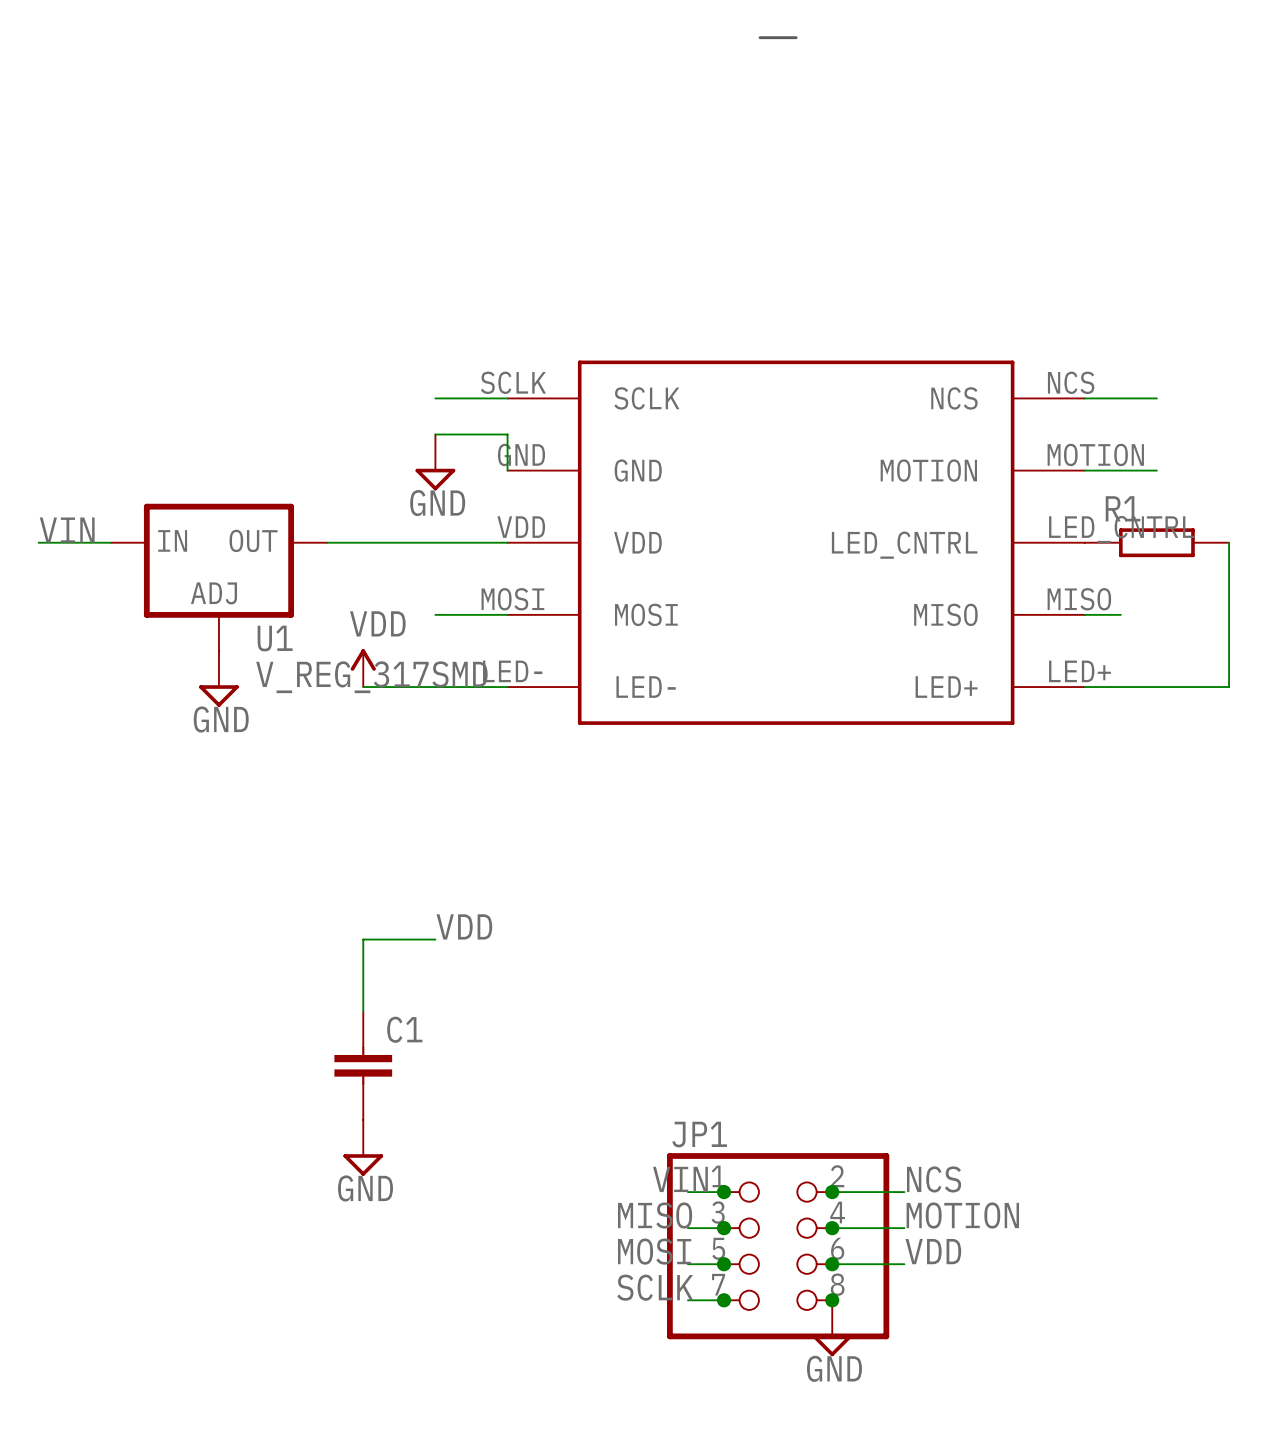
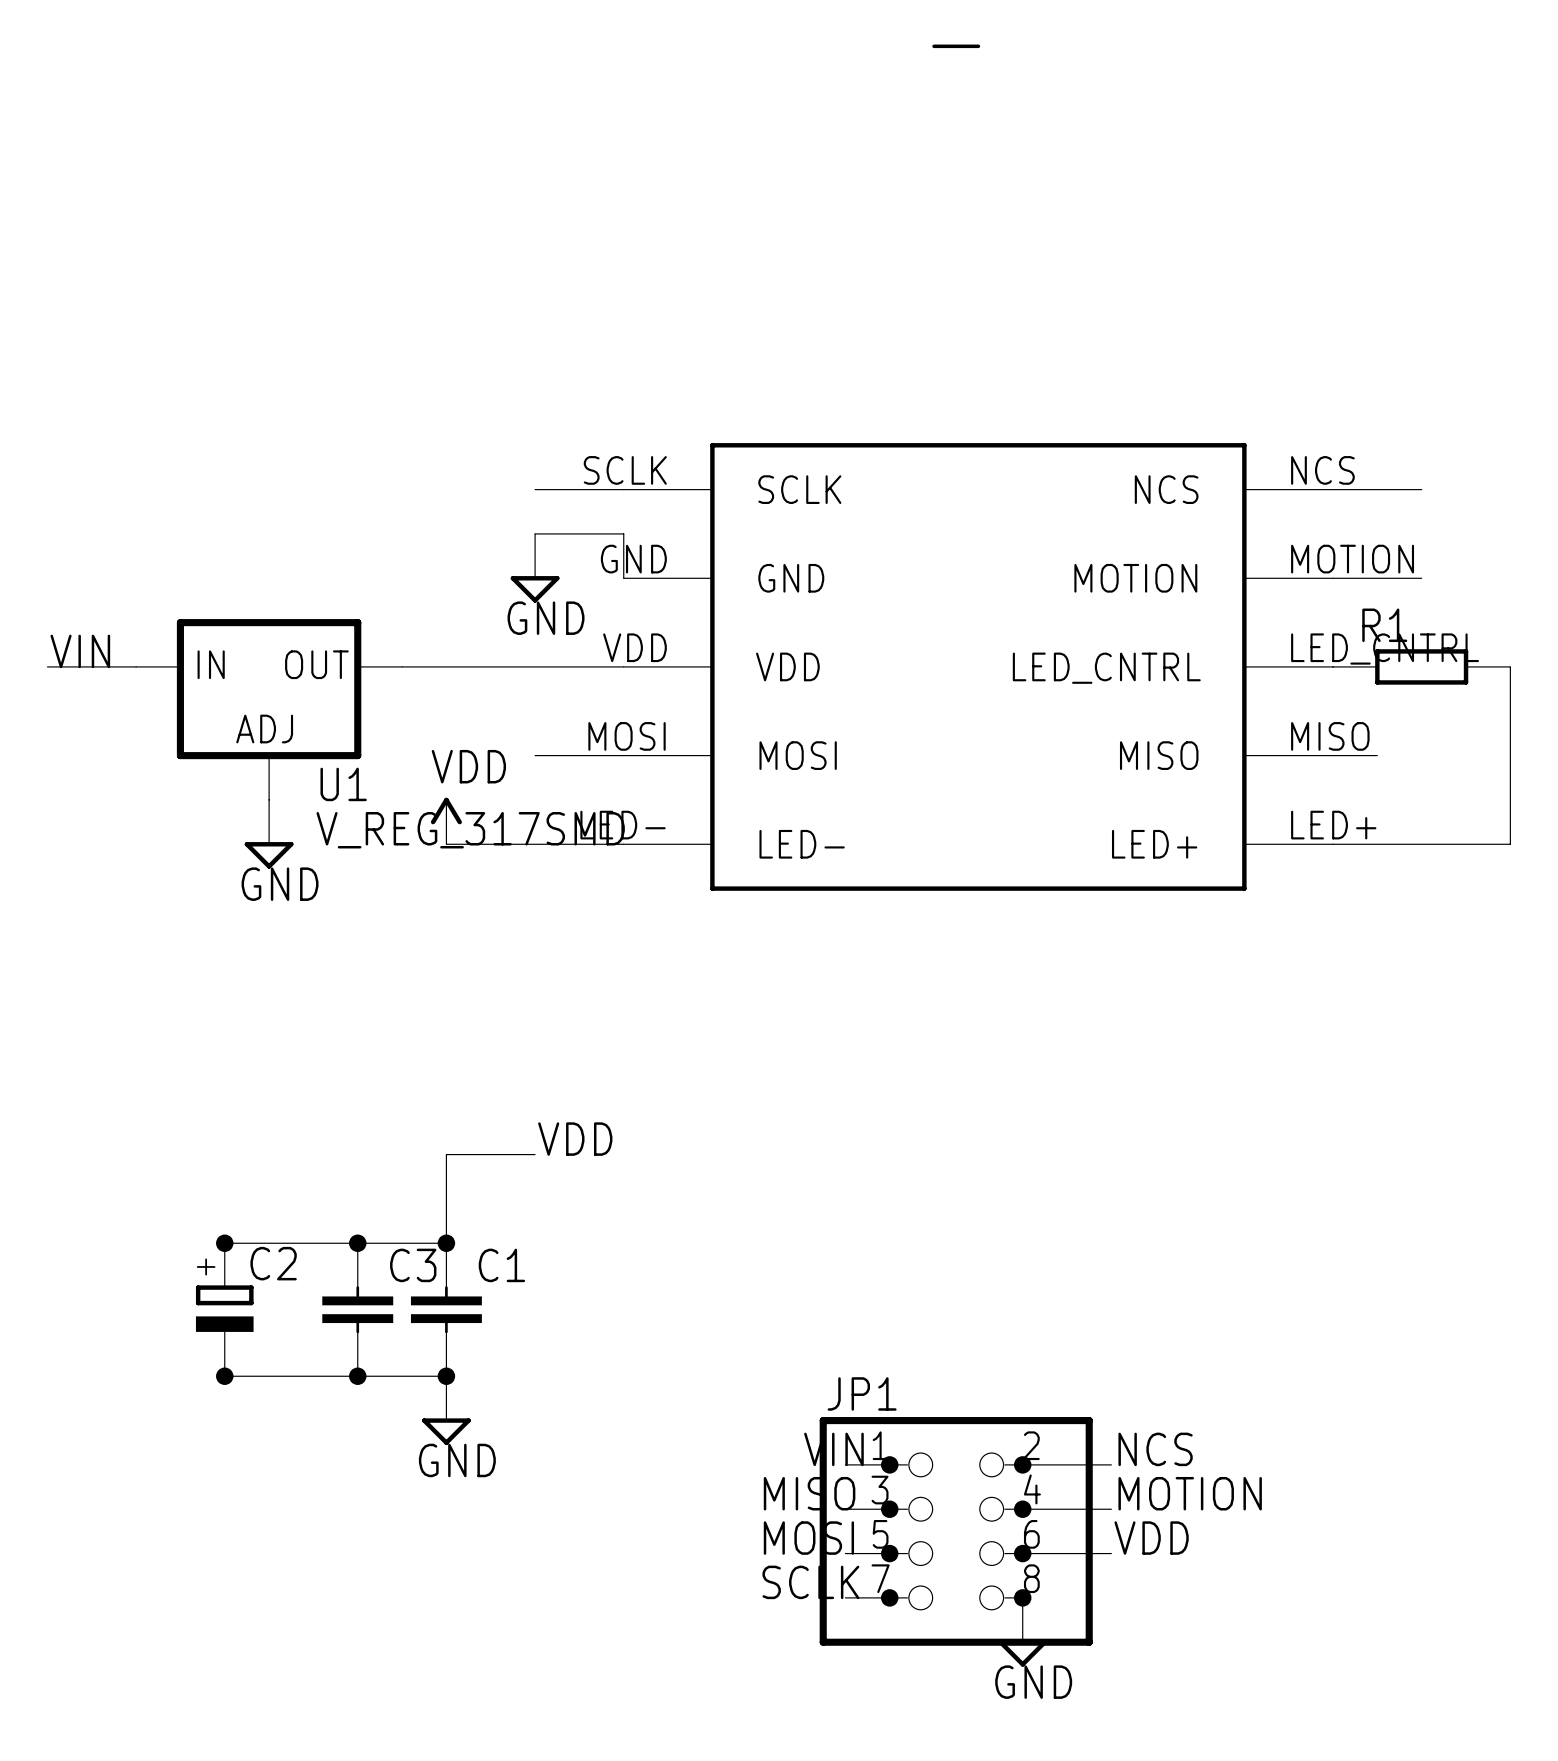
wire: none -> (224, 1243) (446, 1243)
junction: none -> (224, 1243)
junction: none -> (357, 1243)
junction: none -> (446, 1243)
C2: none -> (224, 1309)
C3: none -> (357, 1309)
wire: none -> (224, 1376) (446, 1376)
junction: none -> (224, 1376)
junction: none -> (357, 1376)
junction: none -> (446, 1376)

